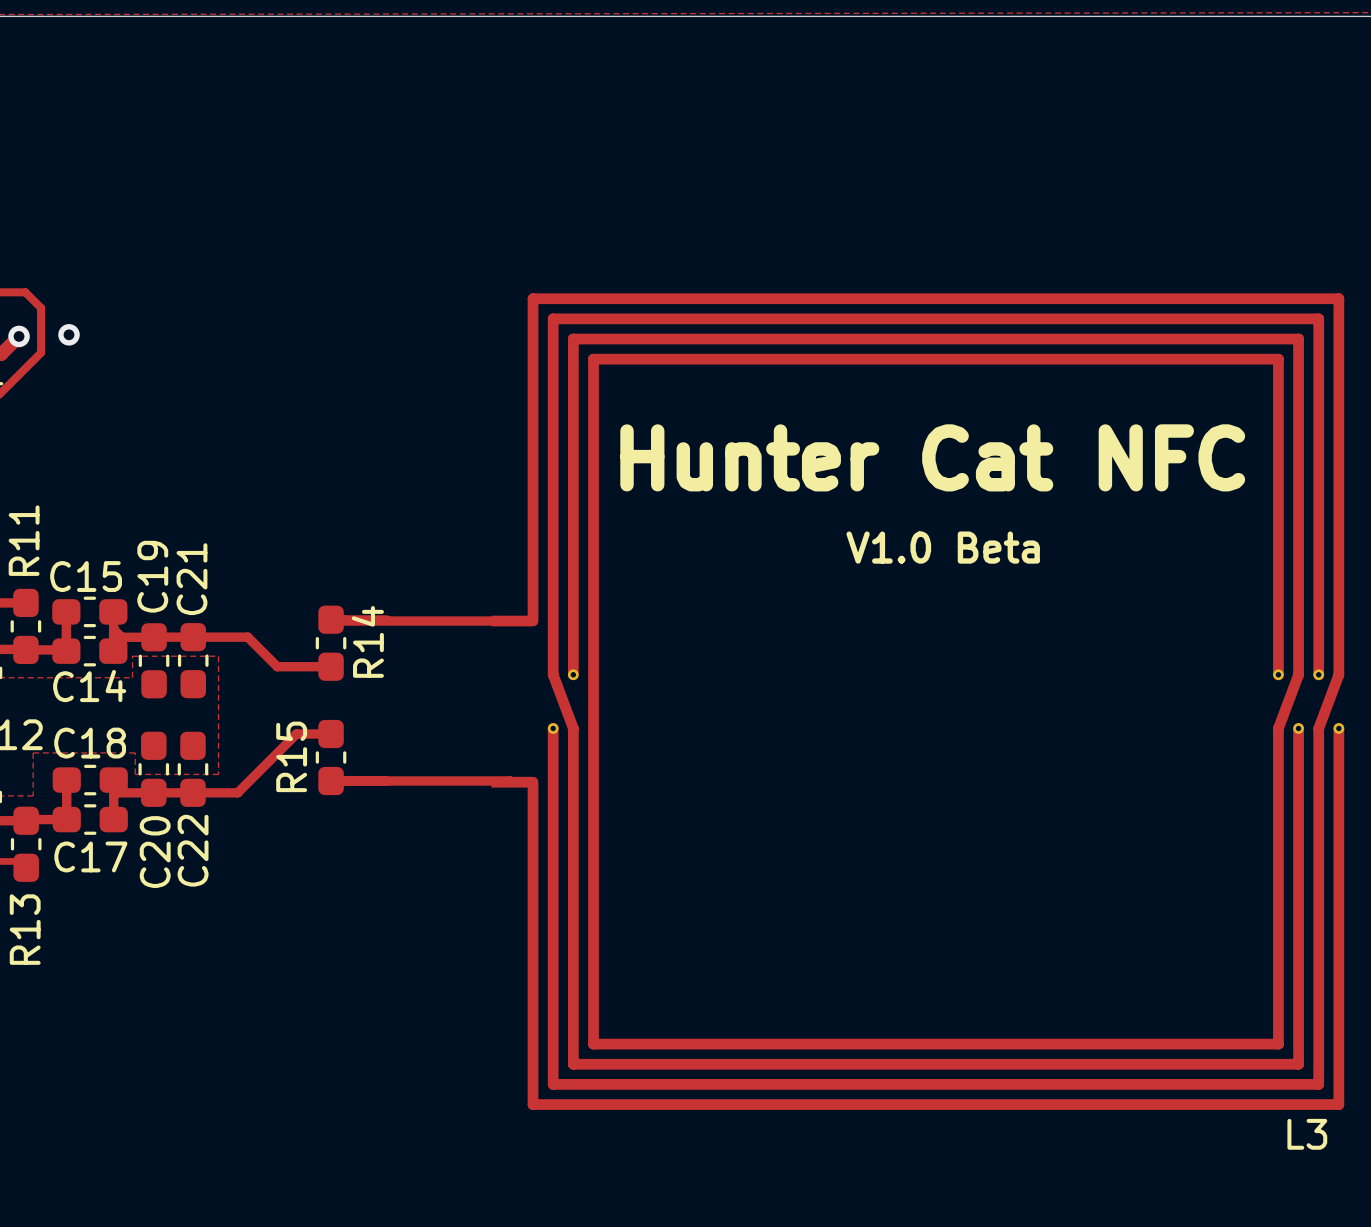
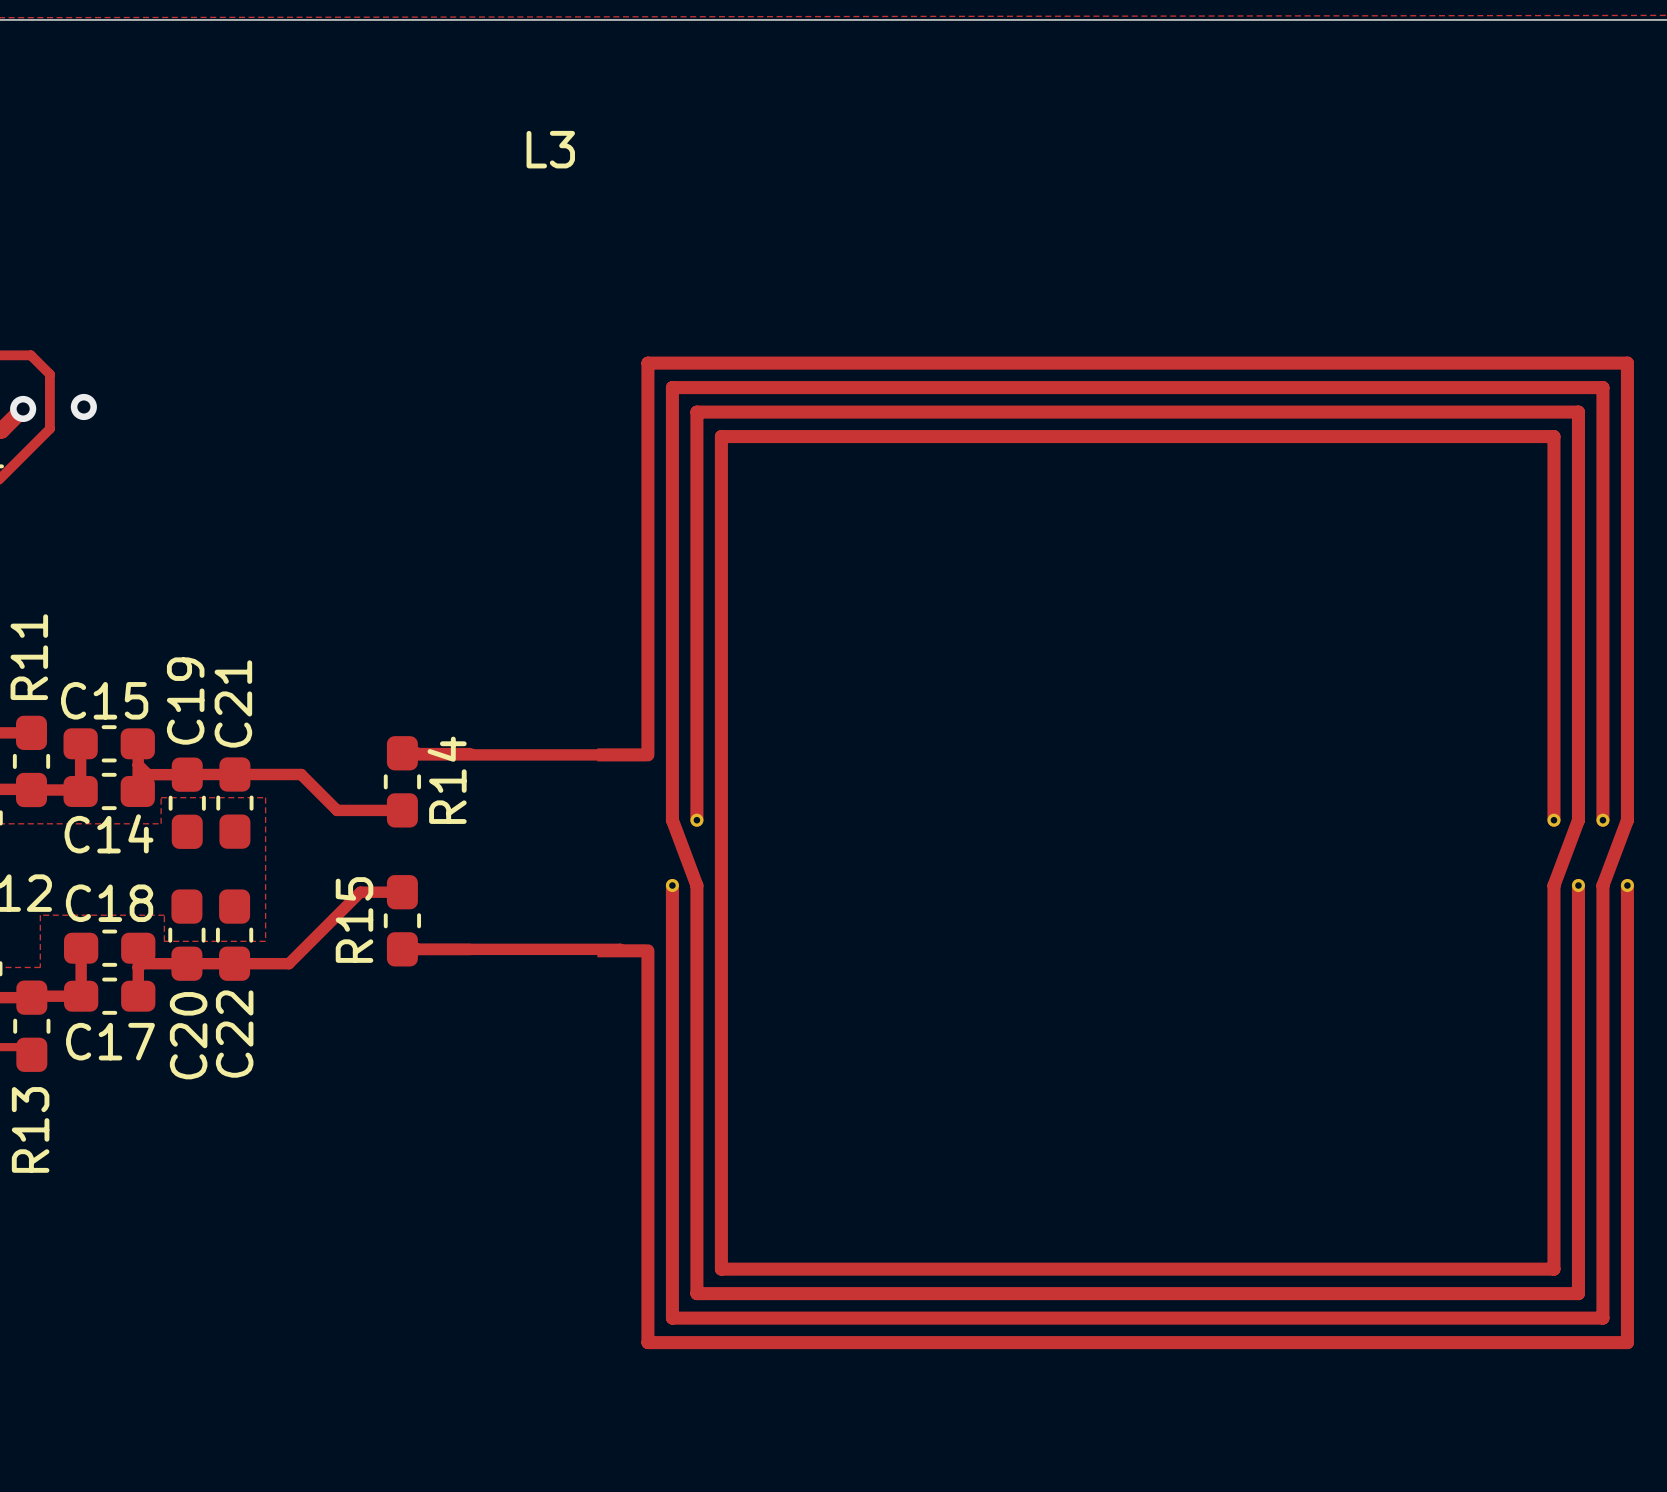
text: Hunter Cat NFC (932, 457) -> none
text: V1.0 Beta (943, 547) -> none
L3 name position: L3 (1307, 1134) -> L3 (550, 149)

